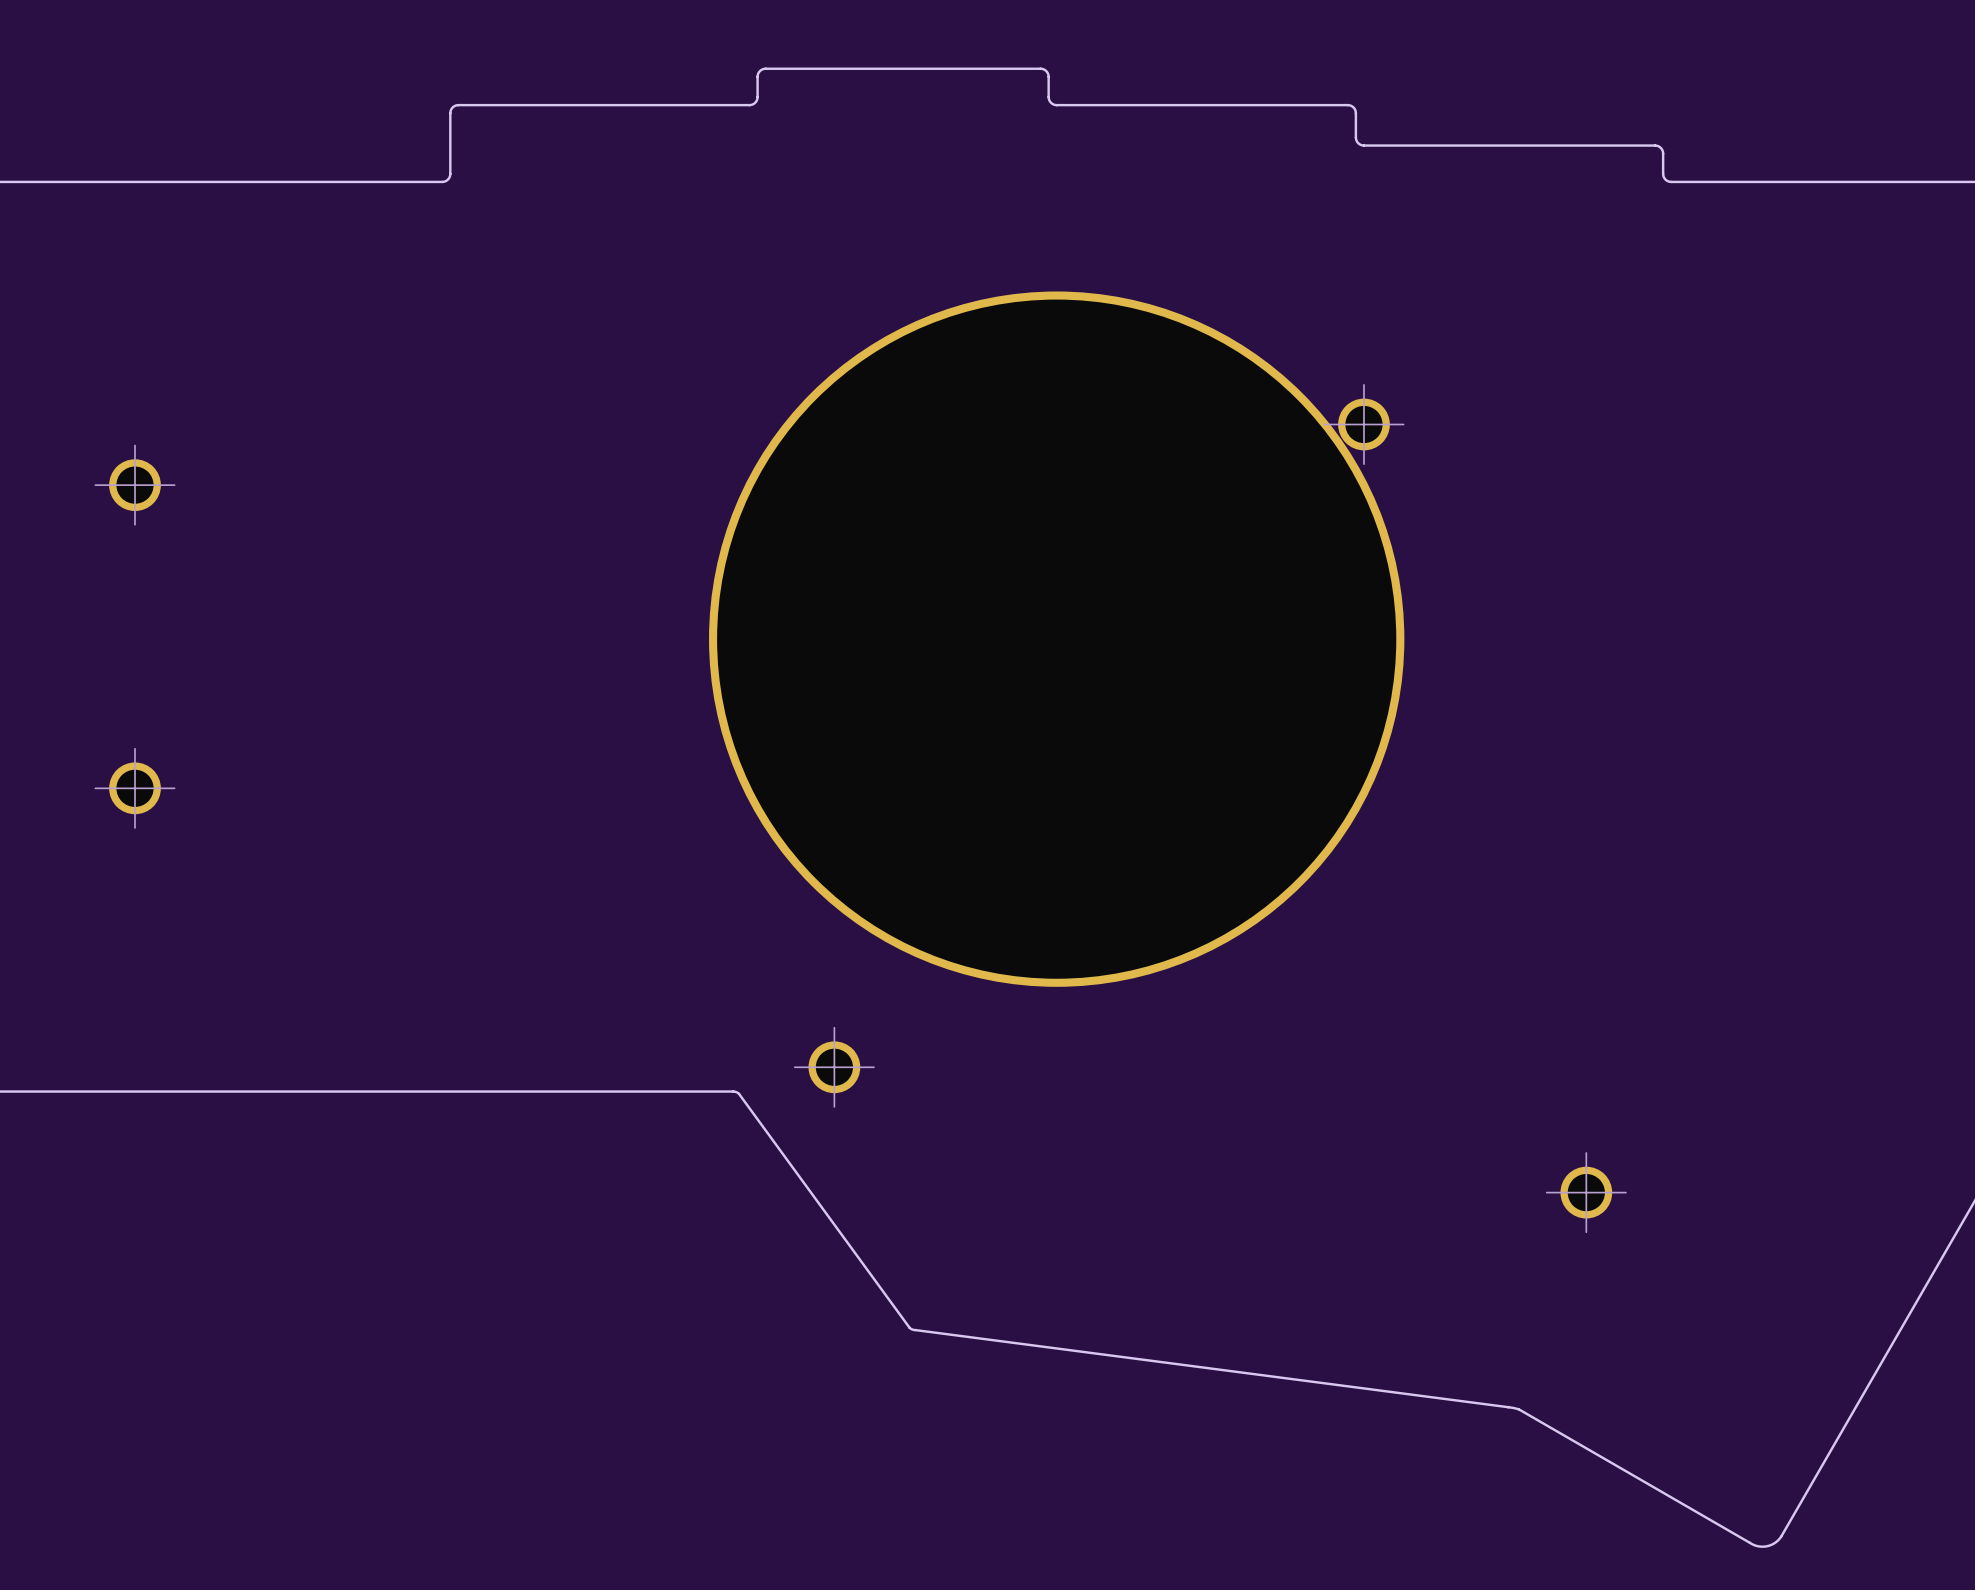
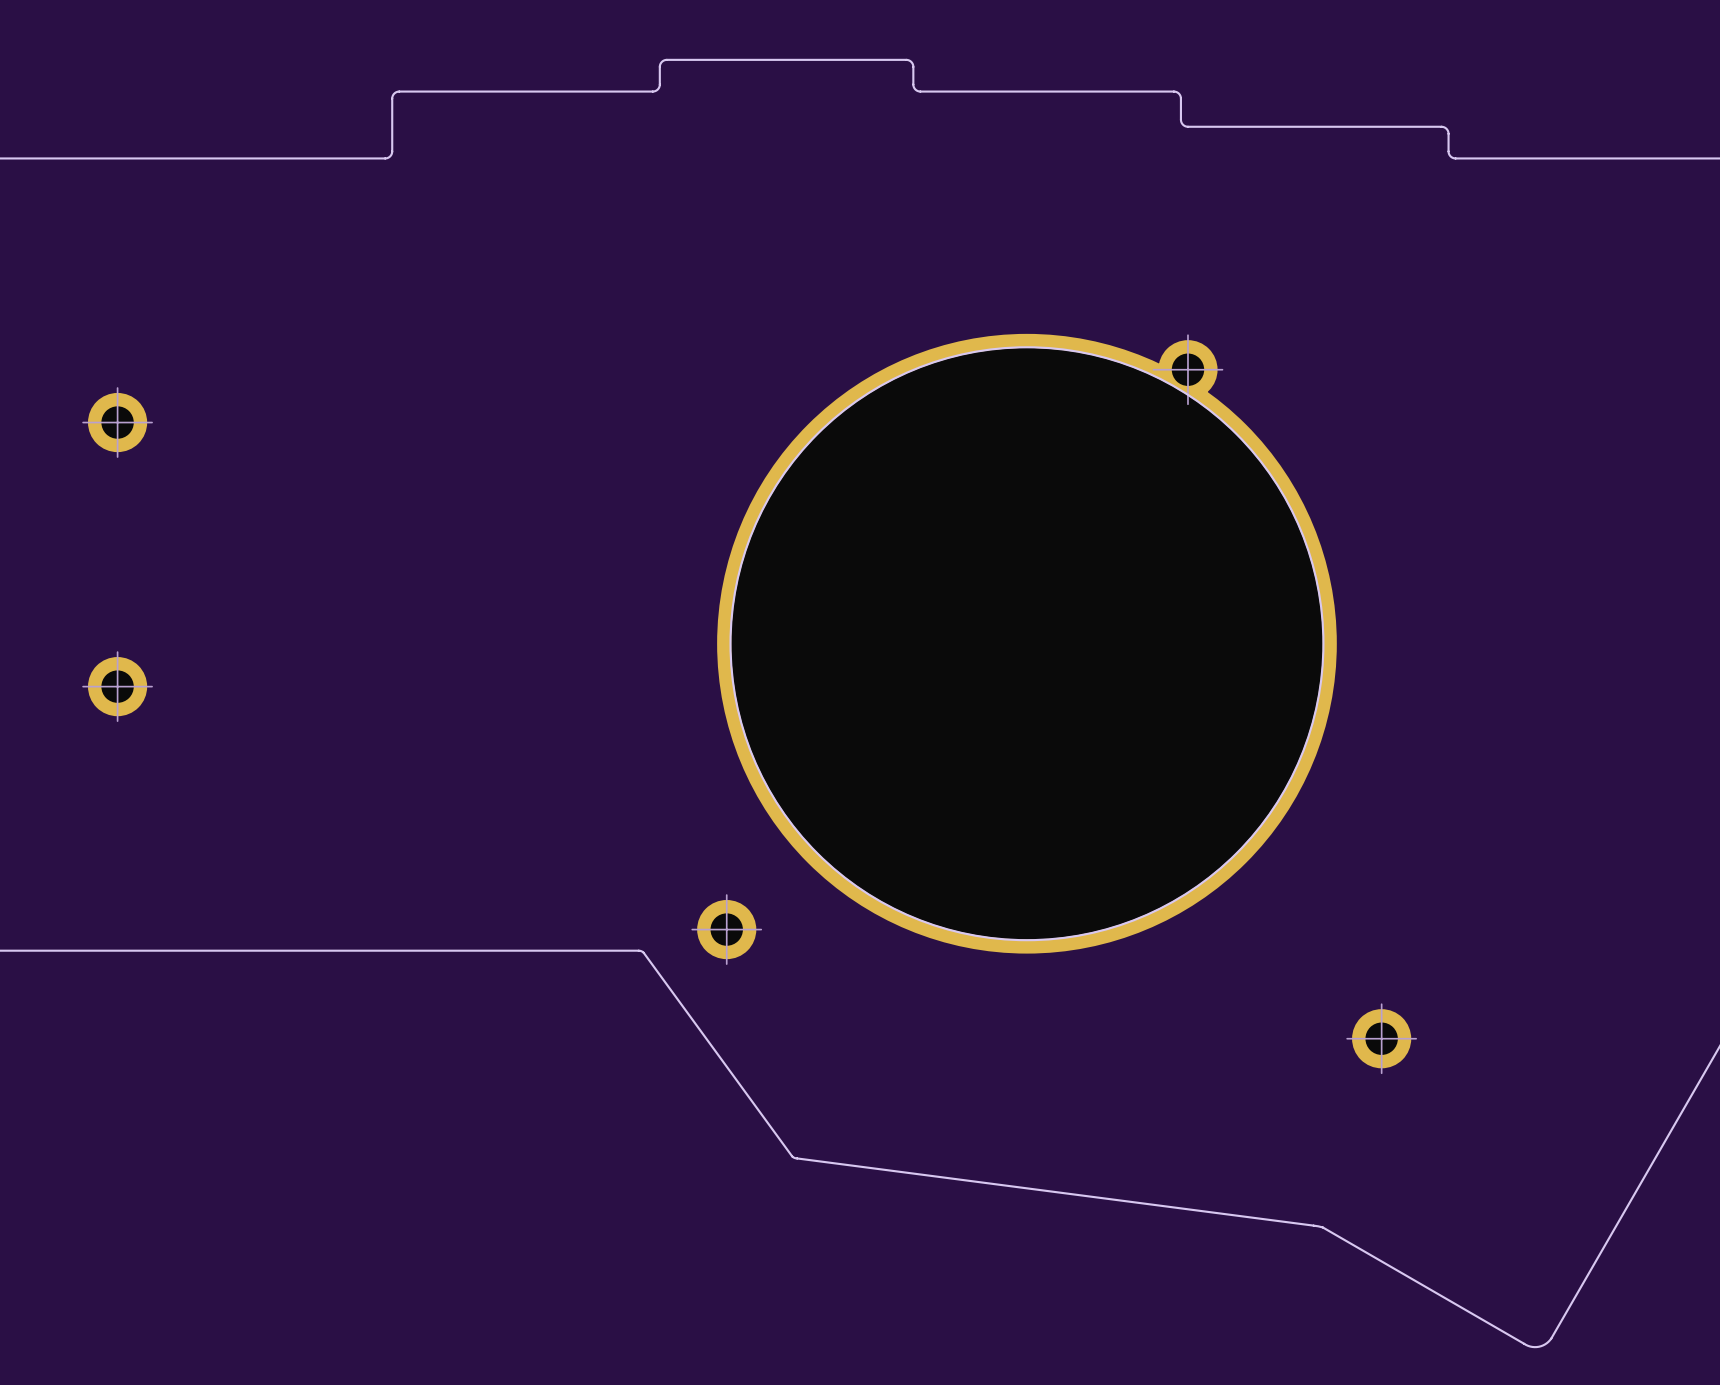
round board edge: none -> [729, 346, 1325, 942]
part footprint: [1338, 398, 1390, 451] -> [1158, 340, 1218, 400]
part footprint: [109, 459, 161, 512] -> [88, 392, 148, 453]
part: (1056, 639) -> none
part: none -> (1026, 643)
part footprint: [109, 762, 161, 815] -> [88, 657, 148, 717]
part footprint: [808, 1041, 861, 1094] -> [697, 899, 757, 960]
part footprint: [1560, 1166, 1613, 1219] -> [1352, 1009, 1412, 1069]

